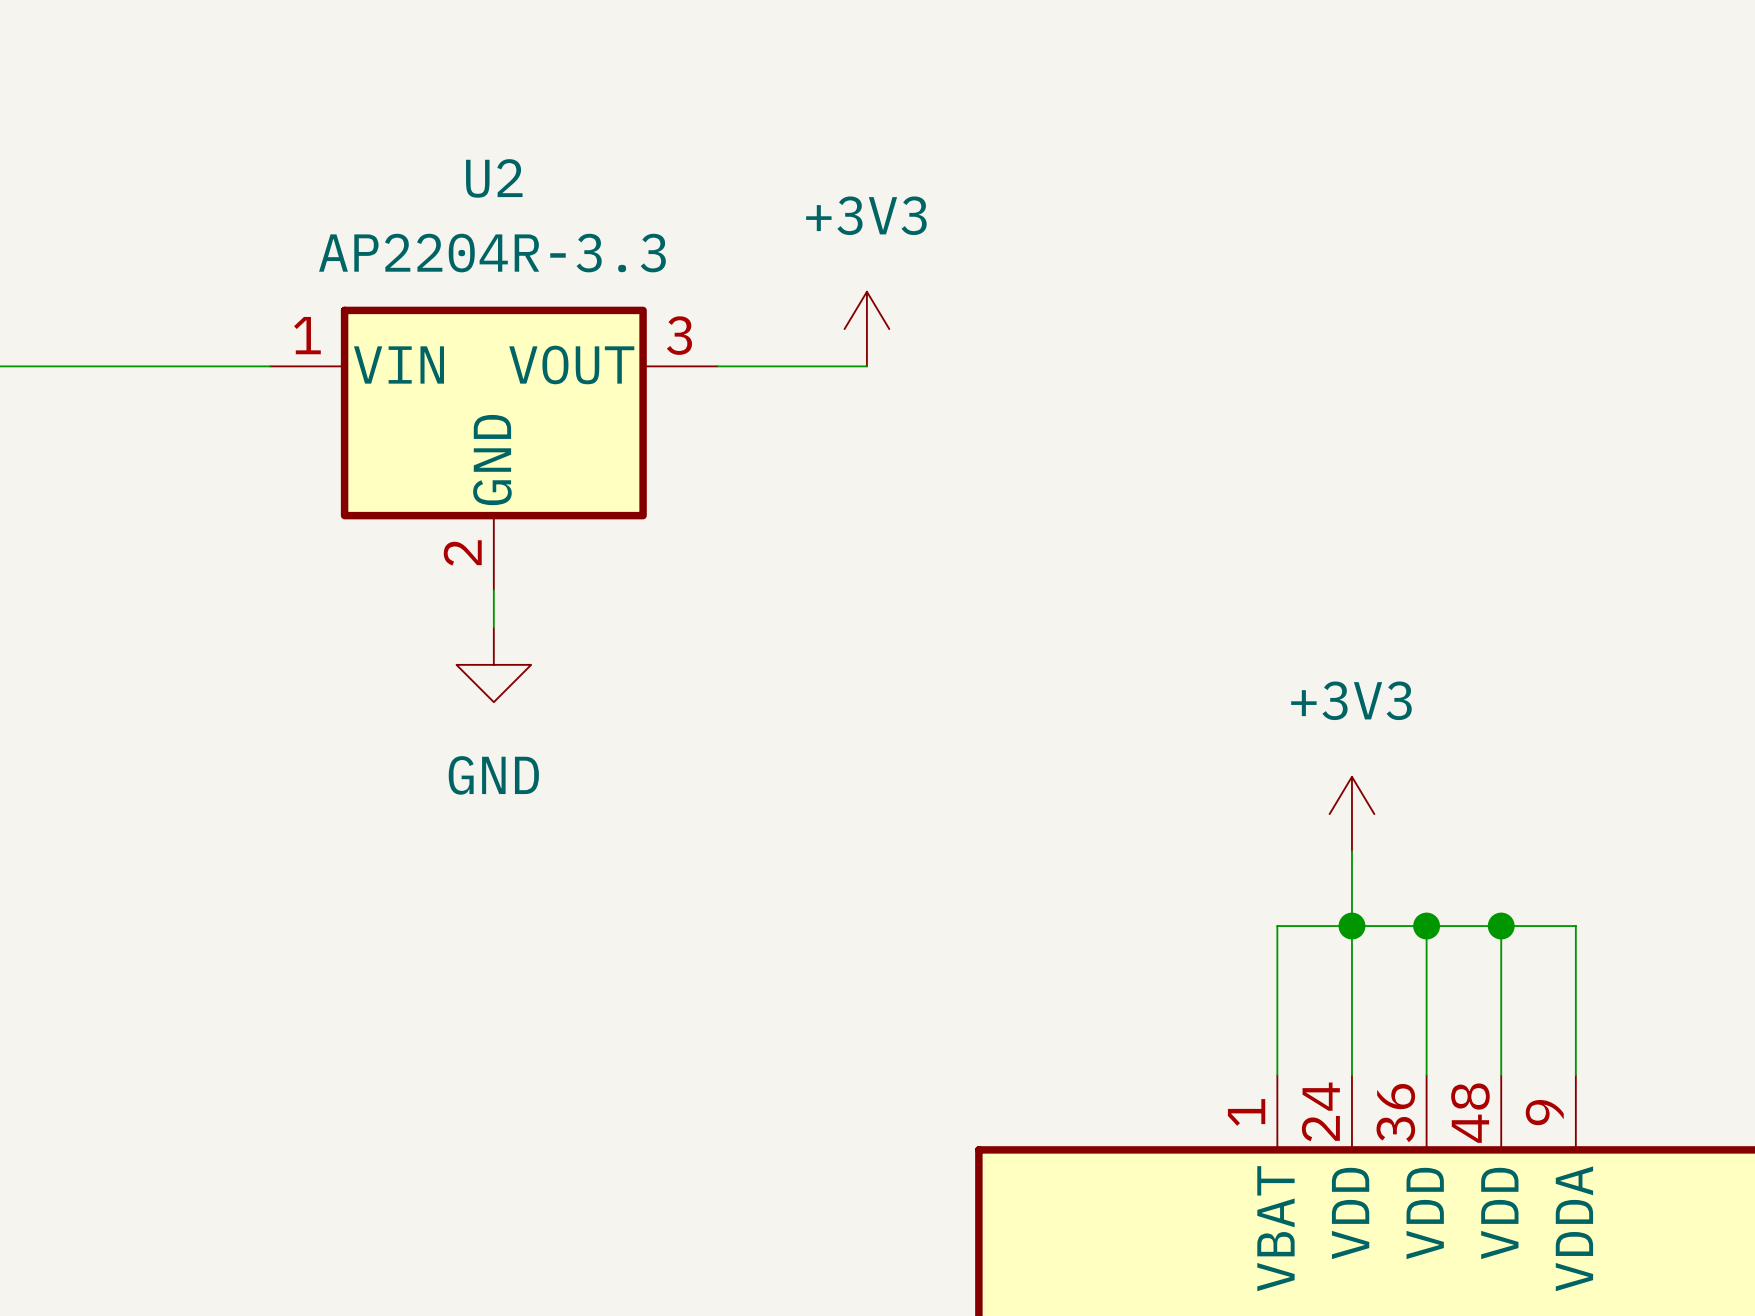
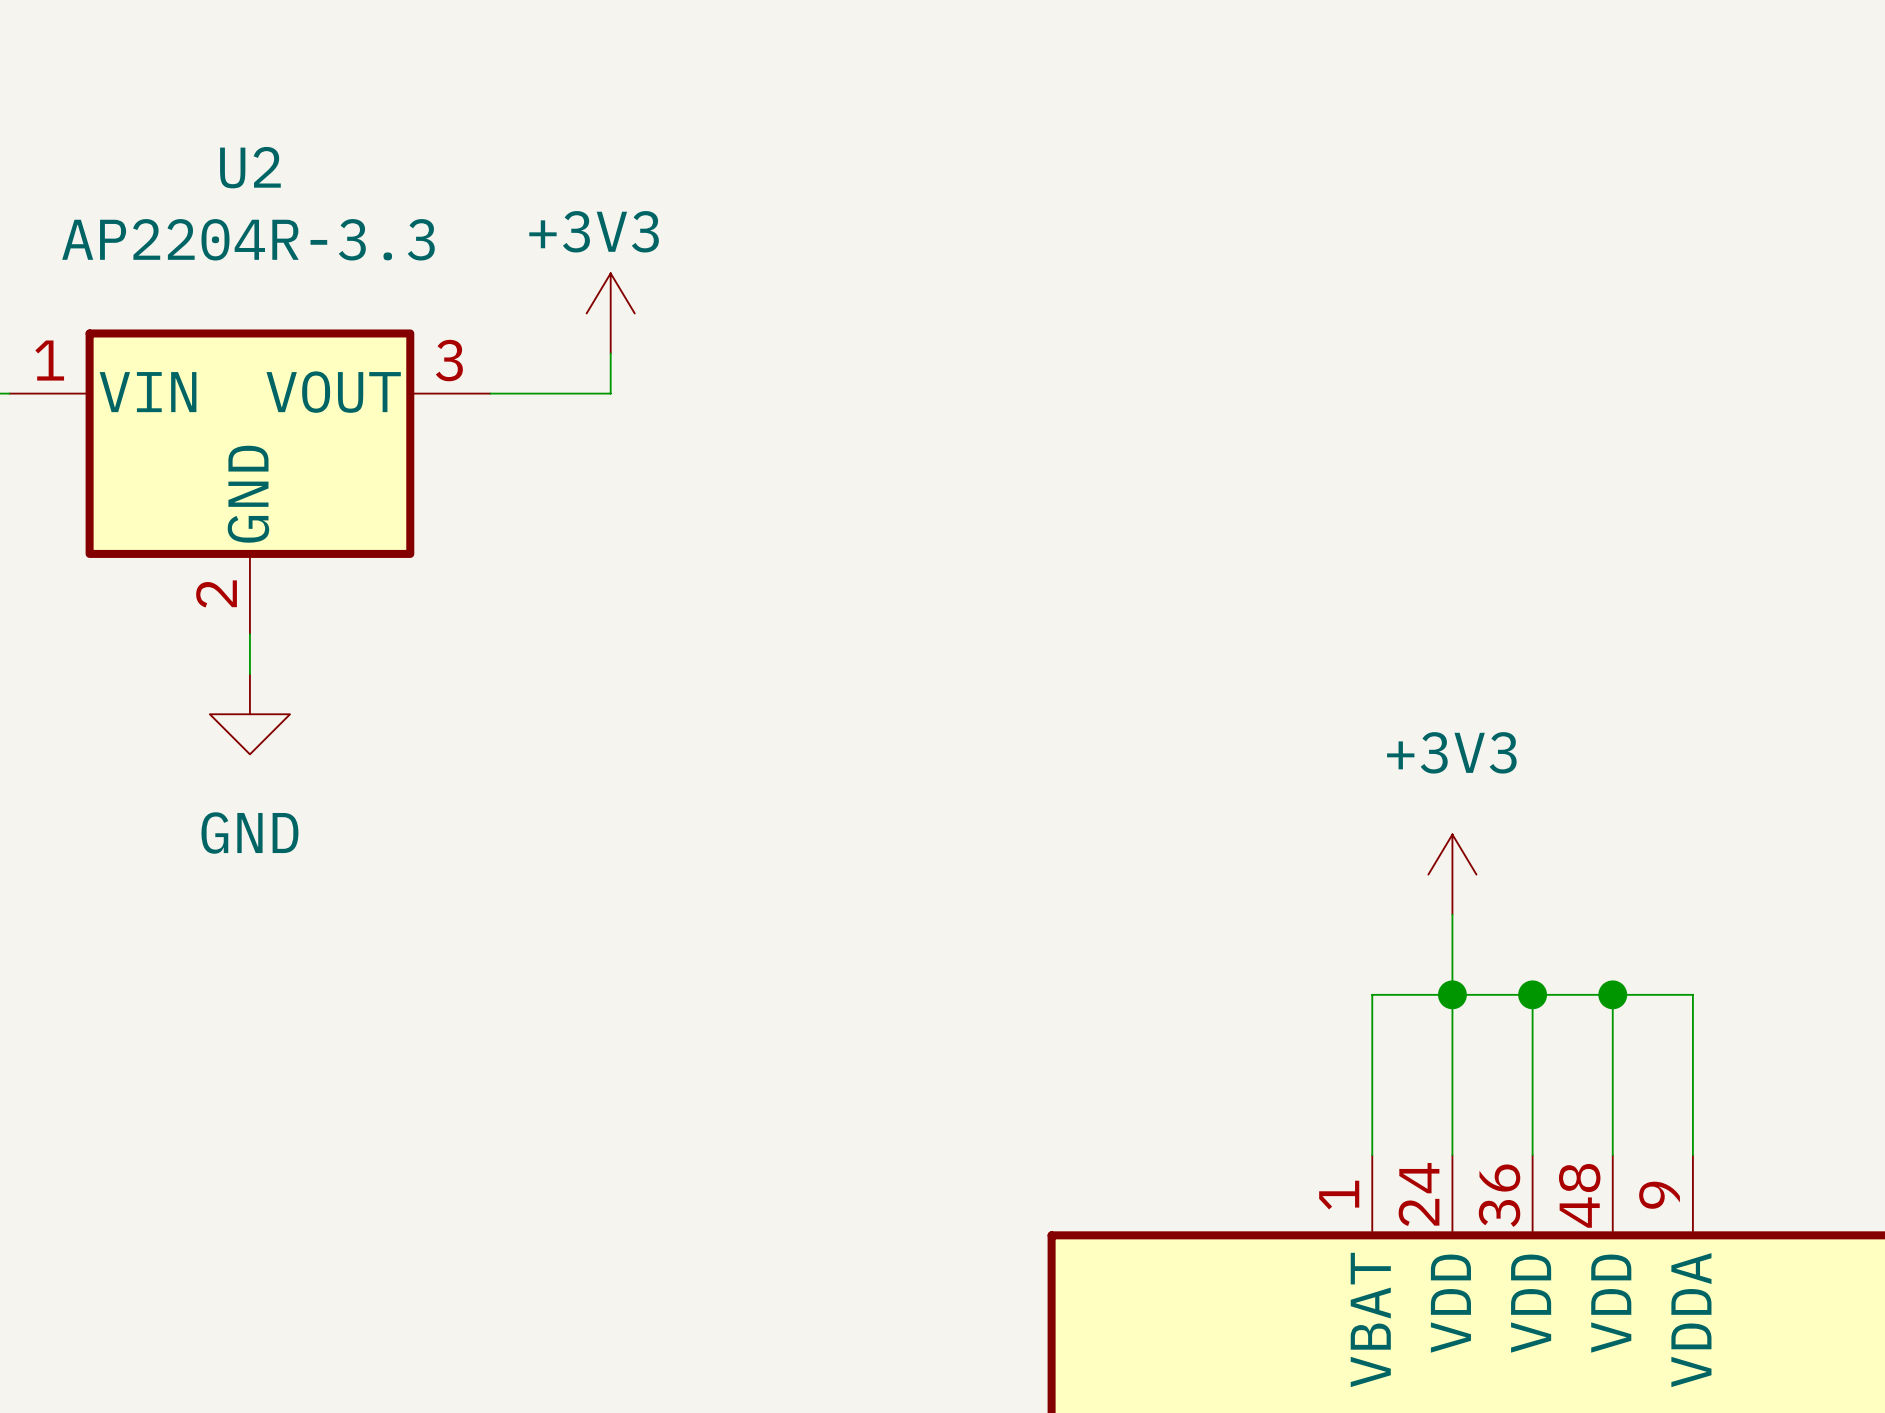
U2 name position: U2 (494, 178) -> U2 (250, 167)
power symbol text position: +3V3 (866, 215) -> +3V3 (594, 231)
U2 value position: AP2204R-3.3 (492, 253) -> AP2204R-3.3 (248, 239)
power symbol position: +3V3 (866, 329) -> +3V3 (610, 313)
wire: (717, 366) (866, 366) -> none
U2 position: (493, 448) -> (249, 481)
wire: (493, 590) (493, 627) -> (249, 634) (249, 674)
power symbol position: GND (493, 664) -> GND (249, 714)

